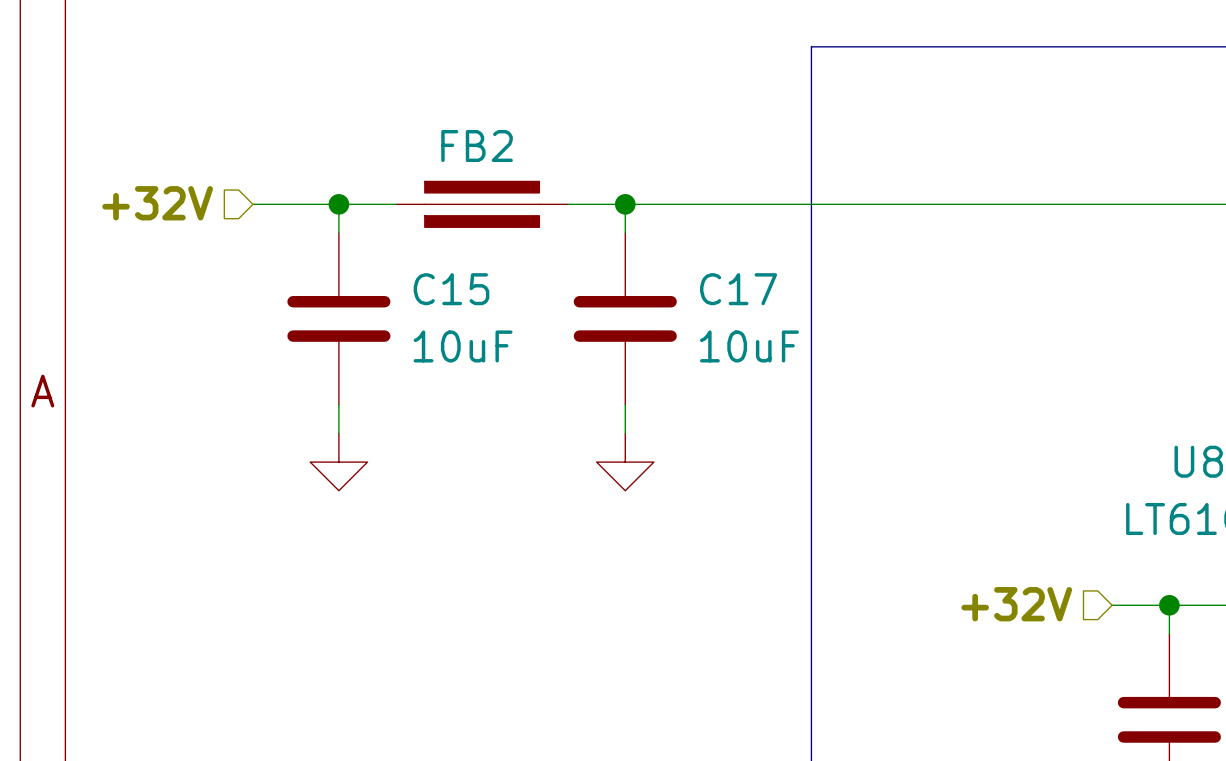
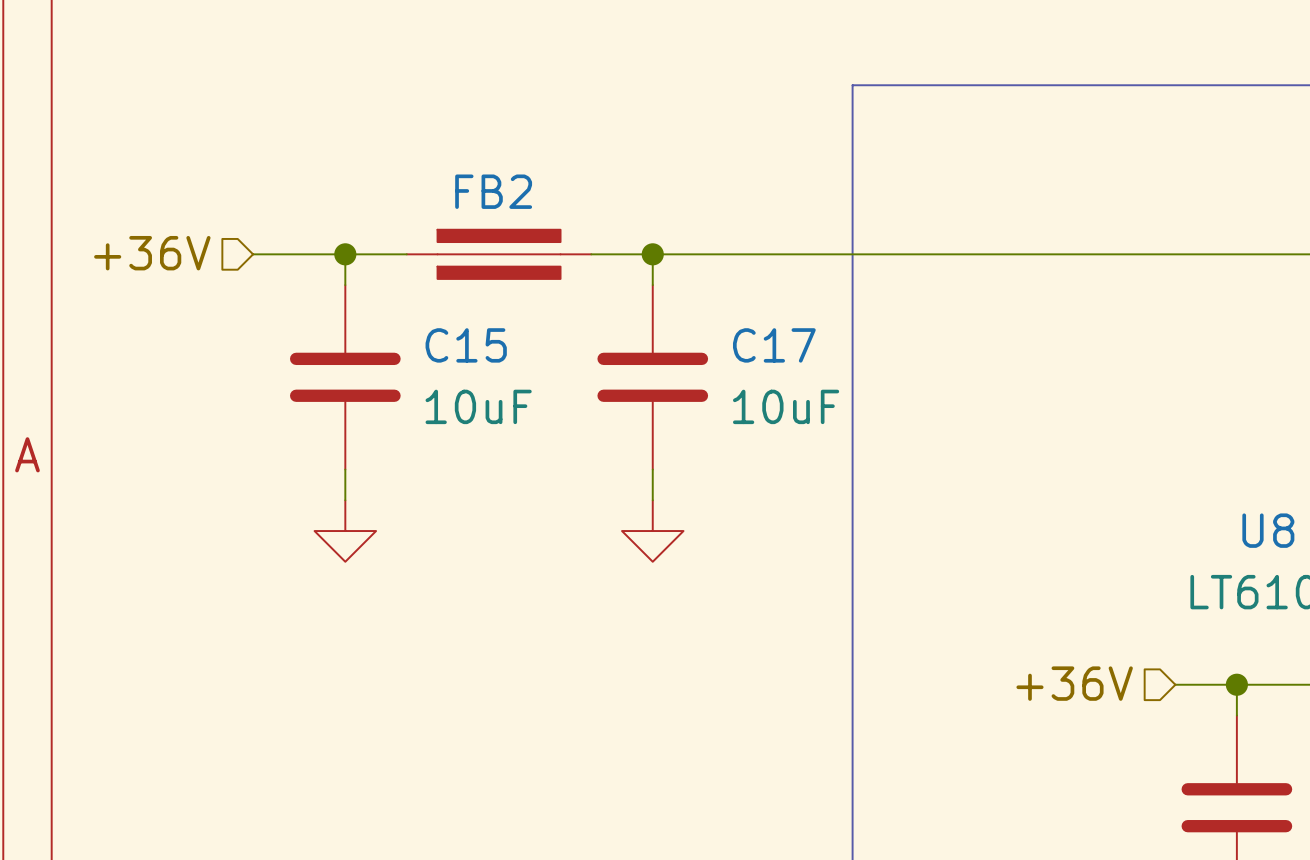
hierarchical label: +32V (157, 203) -> +36V (152, 253)
hierarchical label: +32V (1016, 604) -> +36V (1074, 683)

